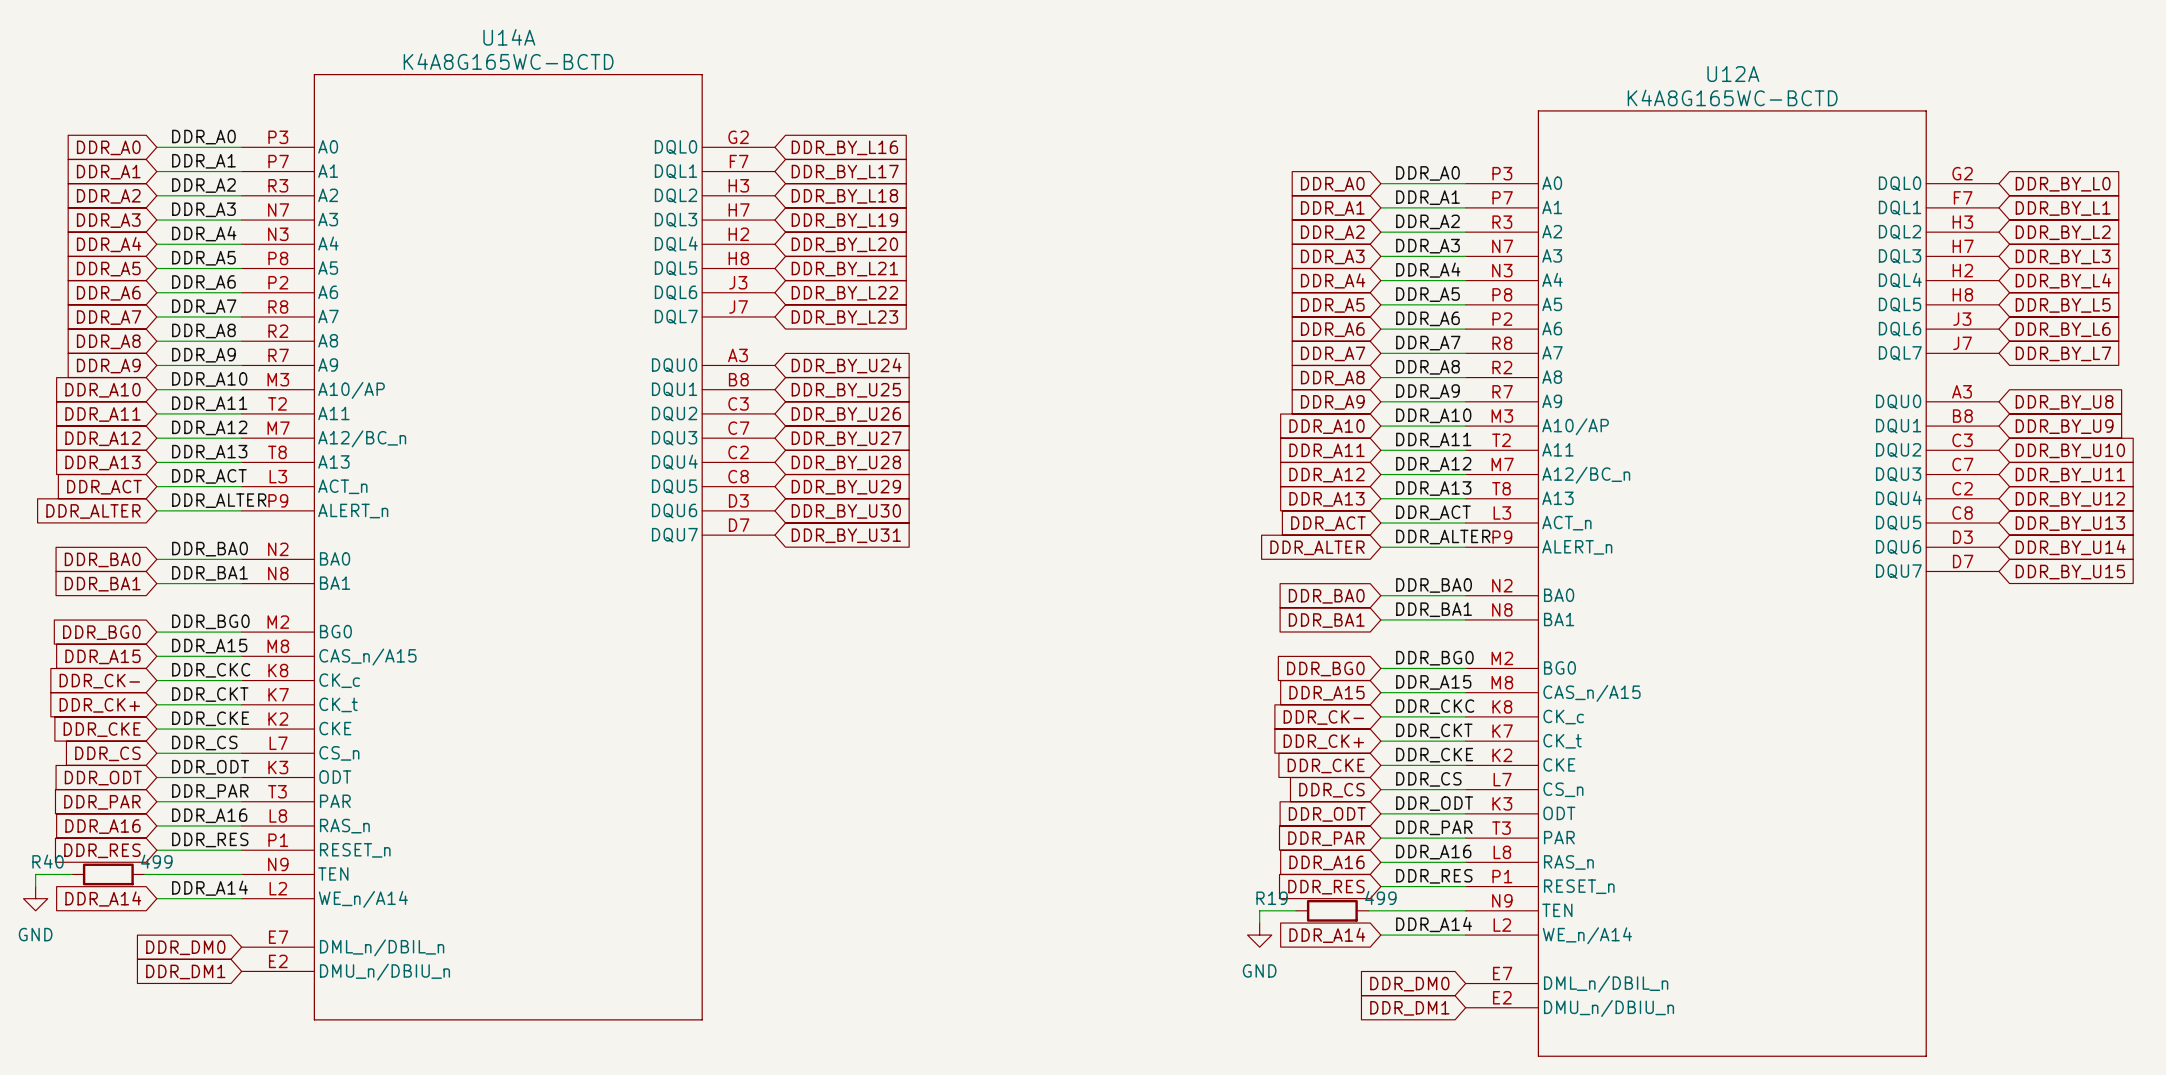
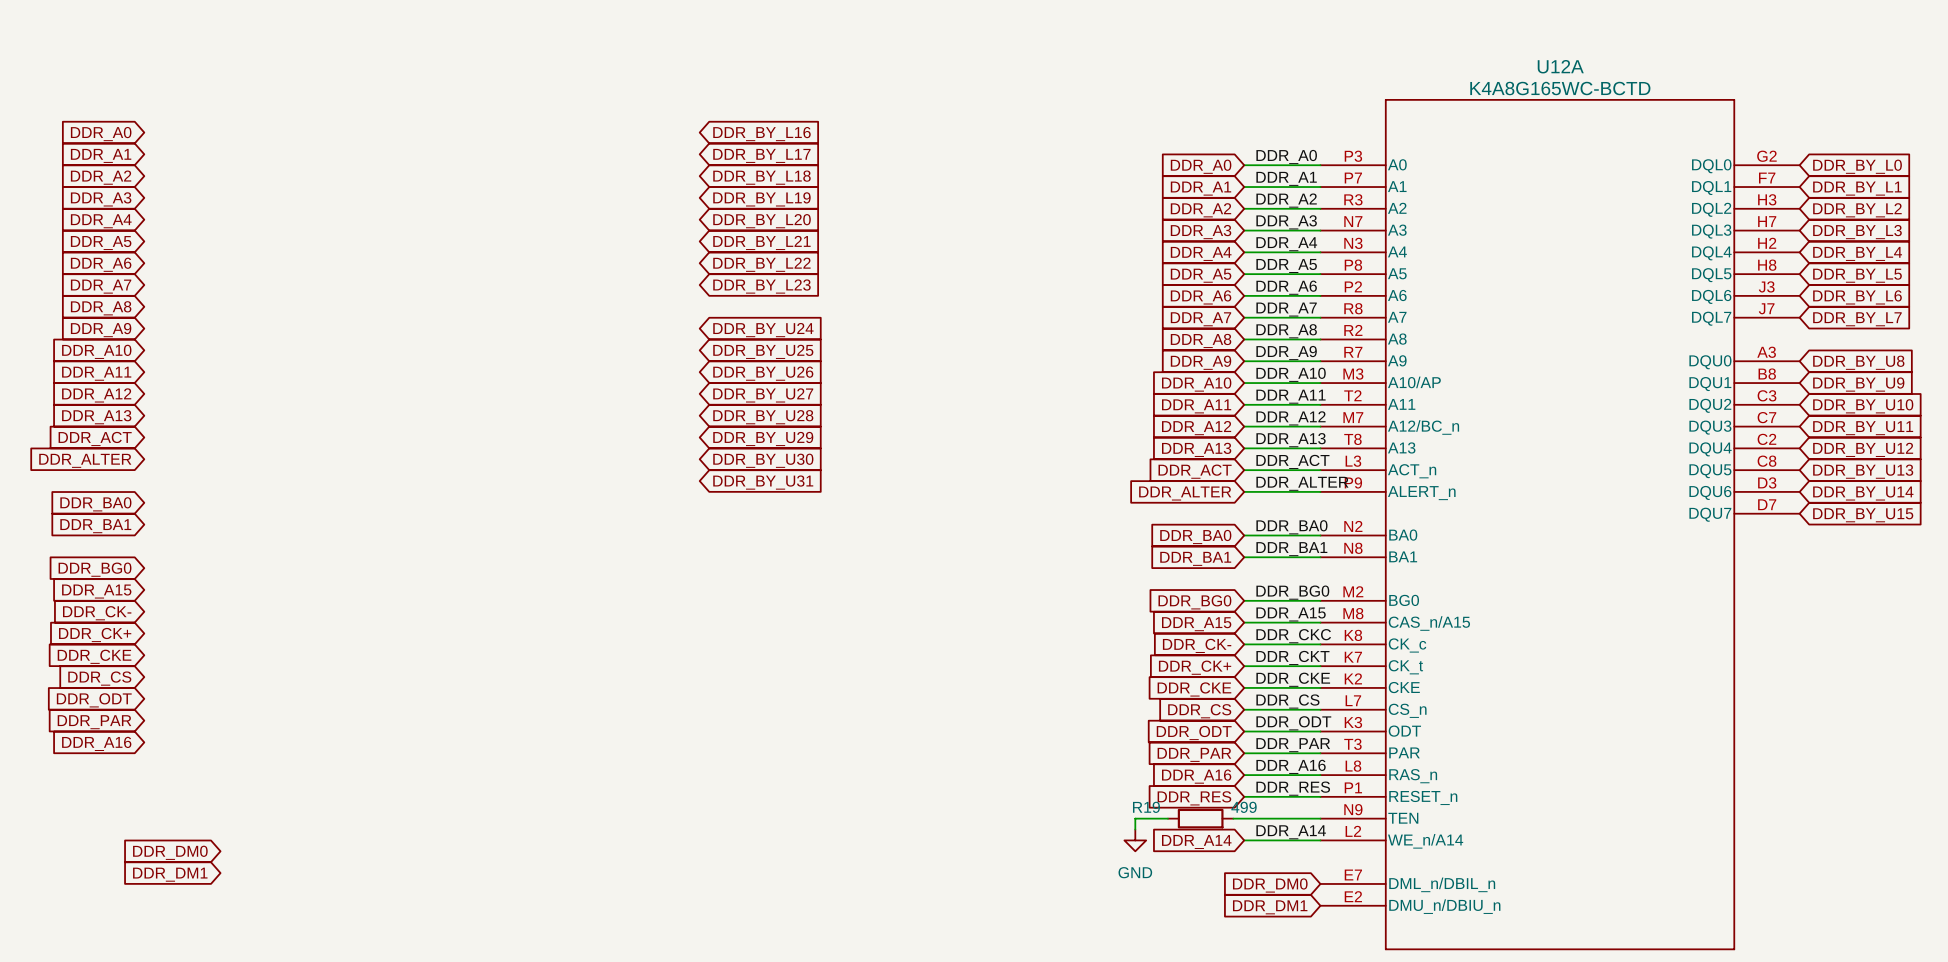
label: DDR_A0 (203, 137) -> none
wire: (156, 147) (241, 147) -> none
label: DDR_A1 (203, 161) -> none
wire: (156, 171) (241, 171) -> none
label: DDR_A2 (203, 185) -> none
wire: (156, 195) (241, 195) -> none
label: DDR_A3 (203, 209) -> none
wire: (156, 220) (241, 220) -> none
label: DDR_A4 (204, 233) -> none
wire: (156, 244) (241, 244) -> none
label: DDR_A5 (203, 258) -> none
wire: (156, 268) (241, 268) -> none
label: DDR_A6 (203, 282) -> none
wire: (156, 292) (241, 292) -> none
label: DDR_A7 (204, 306) -> none
wire: (156, 316) (241, 316) -> none
label: DDR_A8 (203, 330) -> none
wire: (156, 341) (241, 341) -> none
label: DDR_A9 (203, 355) -> none
wire: (156, 365) (241, 365) -> none
label: DDR_A10 (209, 379) -> none
wire: (156, 389) (241, 389) -> none
label: DDR_A11 (209, 403) -> none
wire: (156, 413) (241, 413) -> none
label: DDR_A12 (209, 427) -> none
wire: (156, 438) (241, 438) -> none
label: DDR_A13 (209, 452) -> none
wire: (156, 462) (241, 462) -> none
label: DDR_ACT (209, 476) -> none
wire: (156, 486) (241, 486) -> none
label: DDR_ALTER (219, 500) -> none
wire: (156, 510) (241, 510) -> none
U14A: K4A8G165WC-BCTD (508, 547) -> none
label: DDR_BA0 (210, 549) -> none
wire: (156, 559) (241, 559) -> none
label: DDR_BA1 (210, 573) -> none
wire: (156, 583) (241, 583) -> none
label: DDR_BG0 (210, 621) -> none
wire: (156, 632) (241, 632) -> none
label: DDR_A15 (209, 646) -> none
wire: (156, 656) (241, 656) -> none
label: DDR_CKC (211, 670) -> none
wire: (156, 680) (241, 680) -> none
label: DDR_CKT (210, 694) -> none
wire: (156, 704) (241, 704) -> none
label: DDR_CKE (210, 718) -> none
wire: (156, 729) (241, 729) -> none
label: DDR_CS (204, 743) -> none
wire: (156, 753) (241, 753) -> none
label: DDR_ODT (210, 767) -> none
wire: (156, 777) (241, 777) -> none
label: DDR_PAR (210, 791) -> none
wire: (156, 801) (241, 801) -> none
label: DDR_A16 (209, 815) -> none
wire: (156, 825) (241, 825) -> none
label: DDR_RES (210, 839) -> none
global label: DDR_RES (102, 850) -> none
wire: (156, 850) (241, 850) -> none
wire: (71, 874) (35, 874) (35, 886) -> none
R40: 499 (108, 874) -> none
wire: (144, 874) (241, 874) -> none
label: DDR_A14 (210, 888) -> none
power symbol: GND (35, 898) -> none
global label: DDR_A14 (103, 898) -> none
wire: (156, 898) (241, 898) -> none

